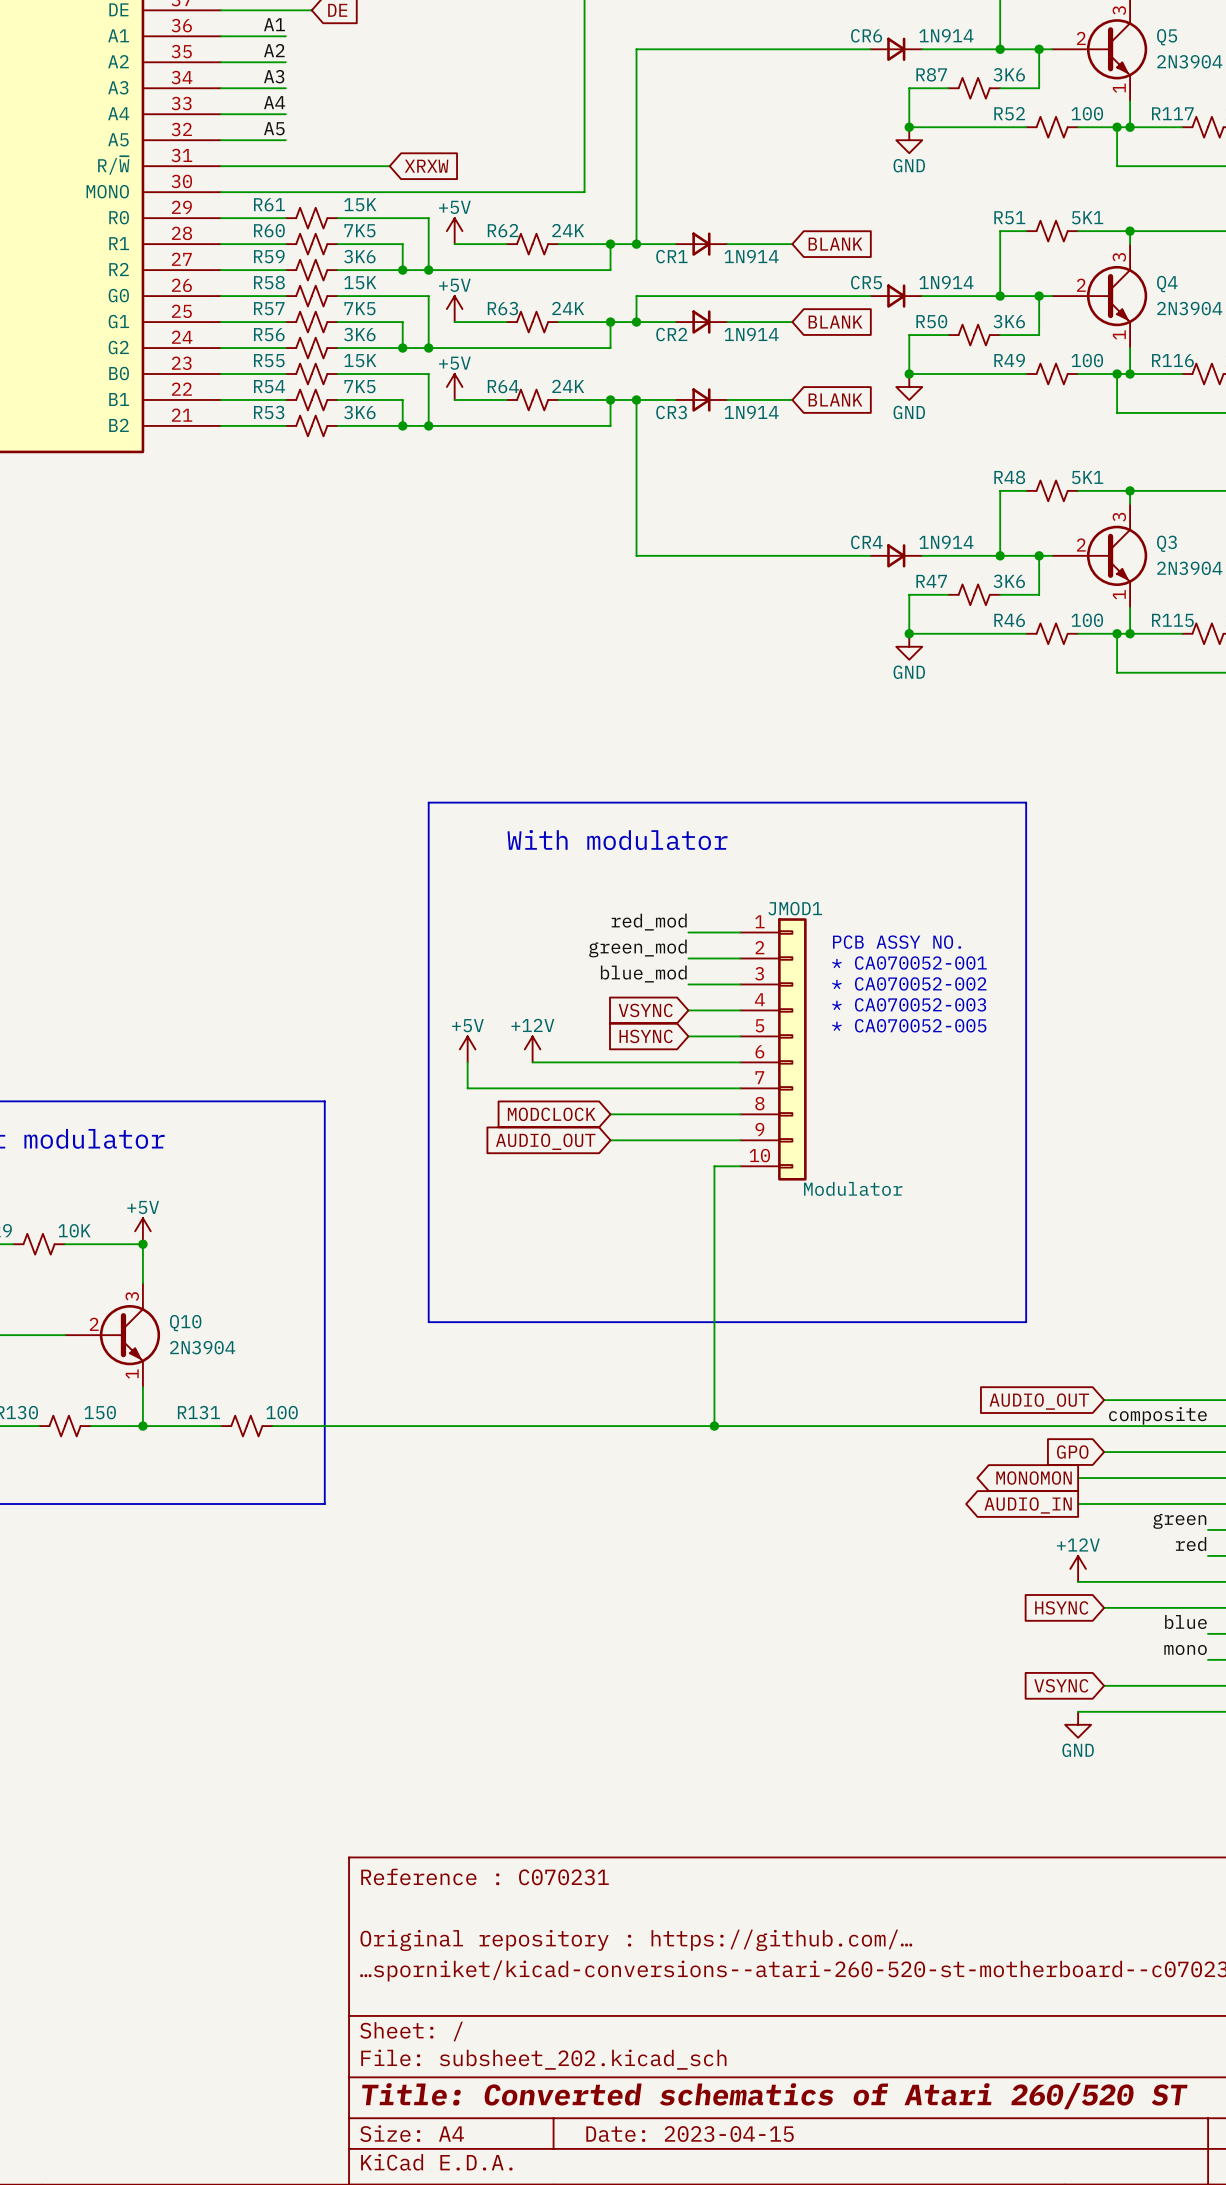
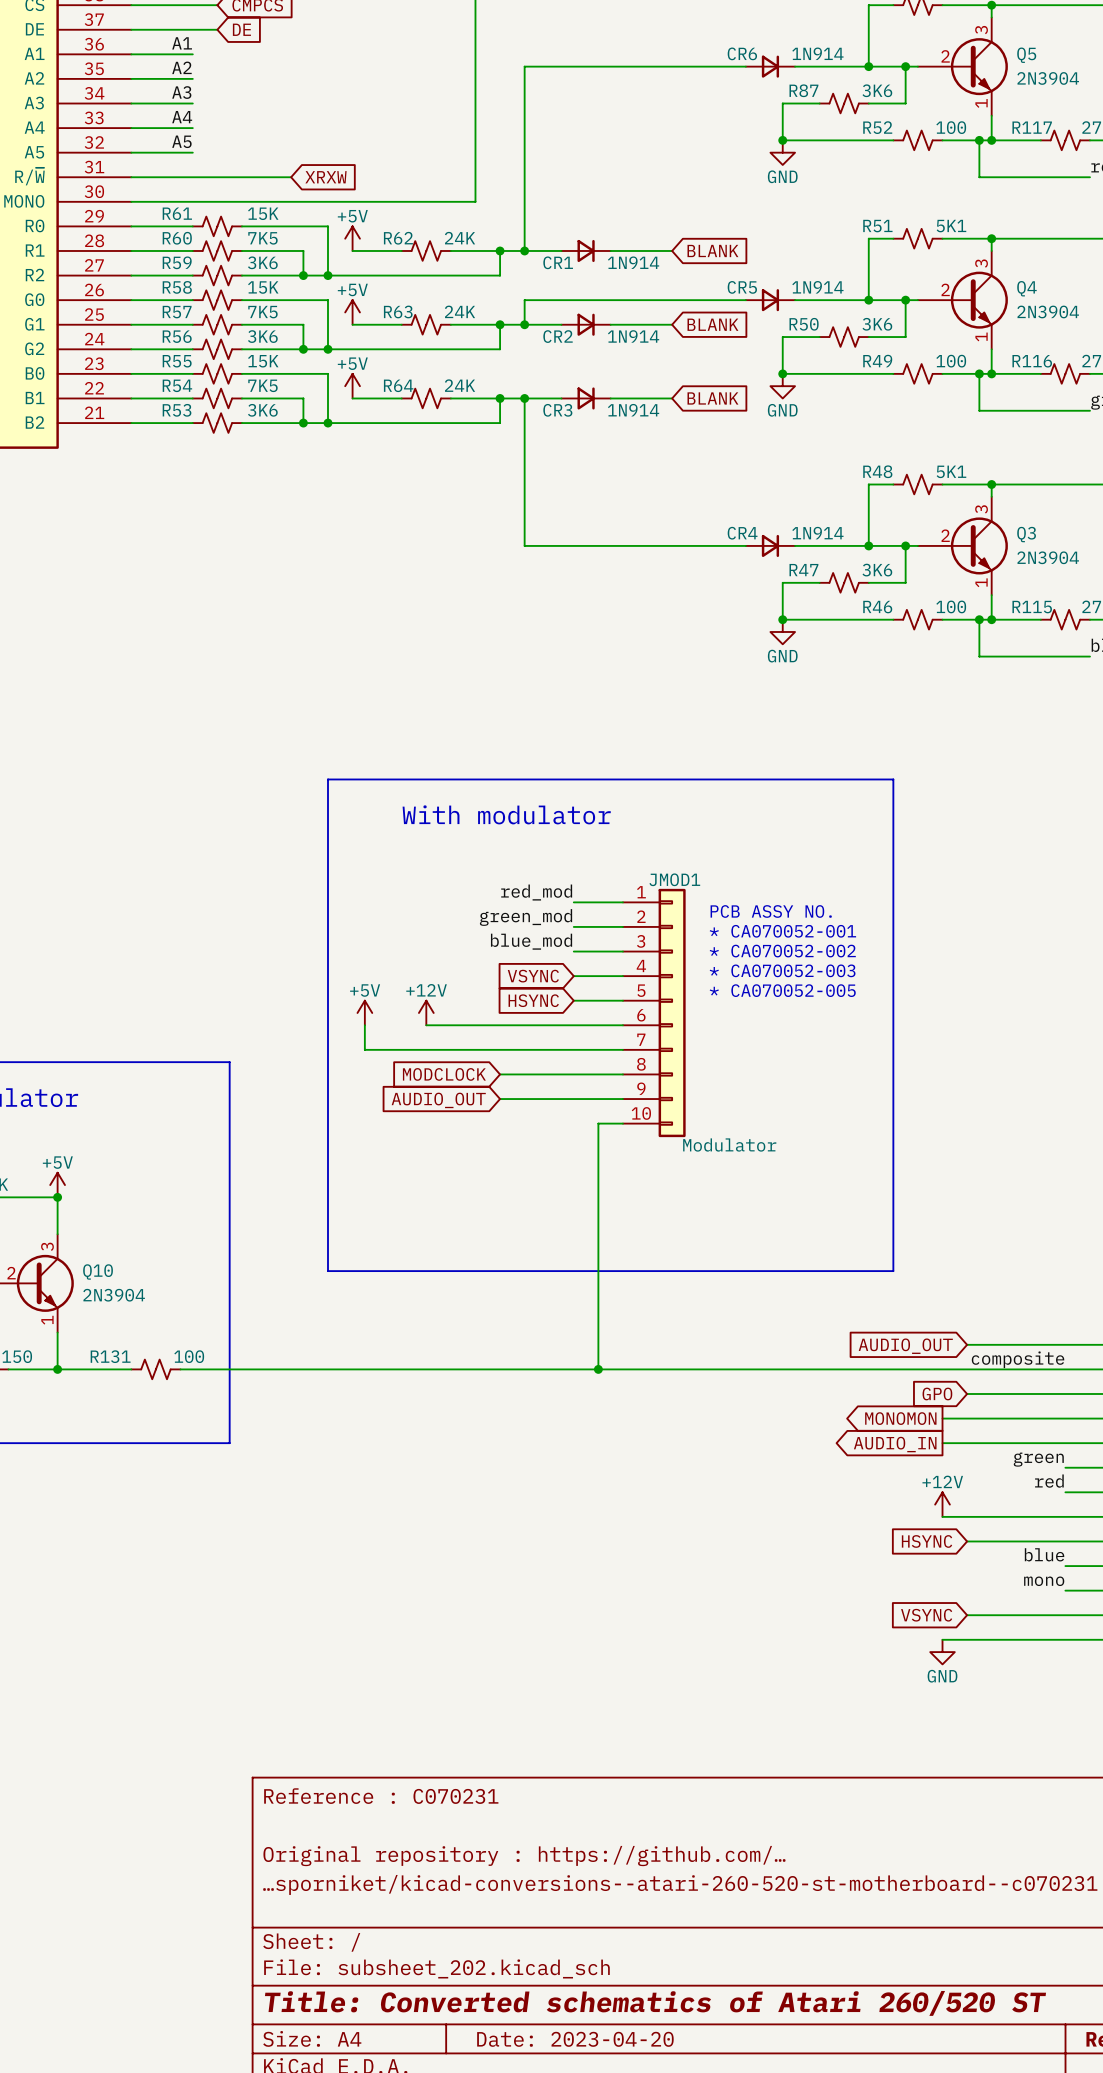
title block: Date: 2023-04-15 (690, 2134) -> Date: 2023-04-20 (575, 2039)

